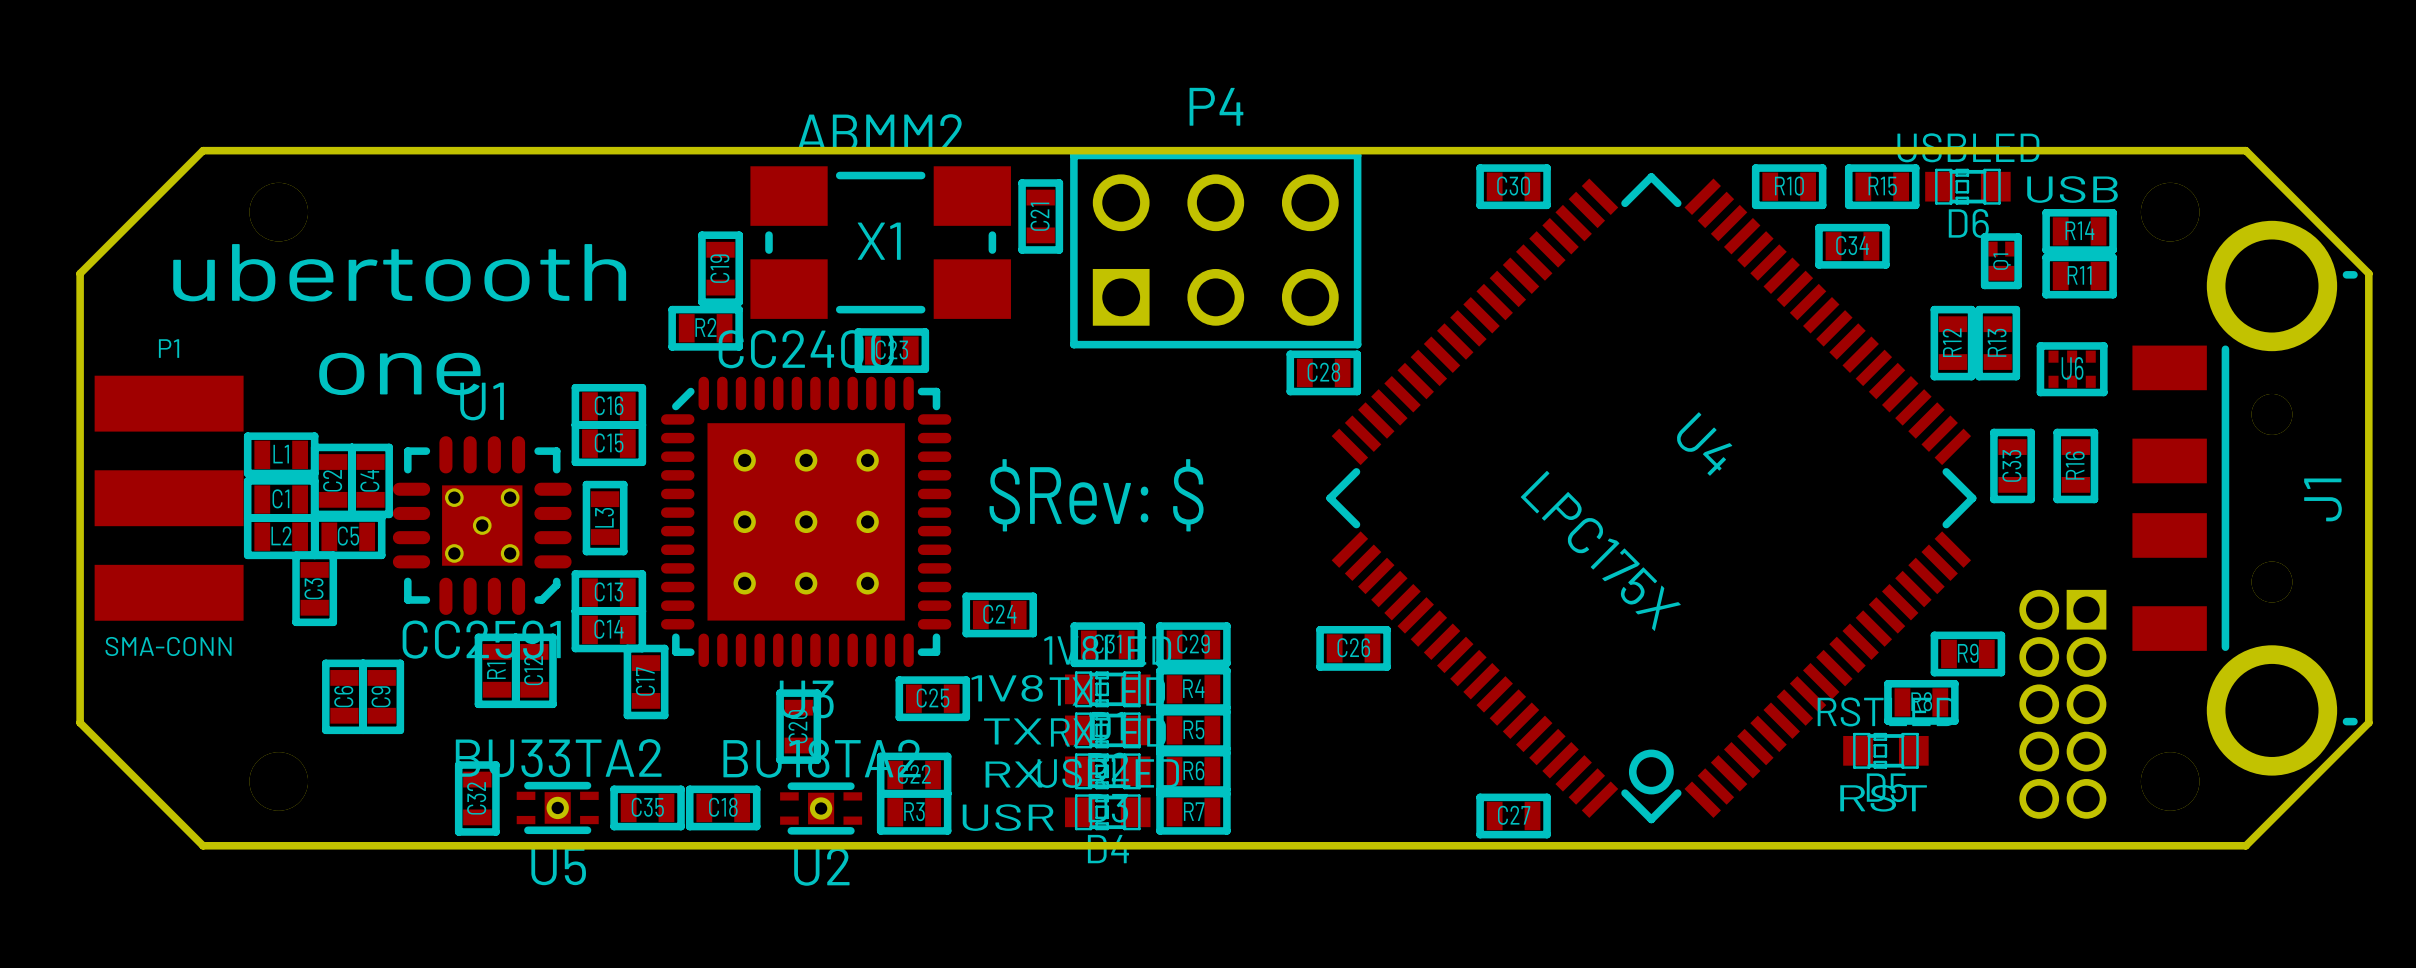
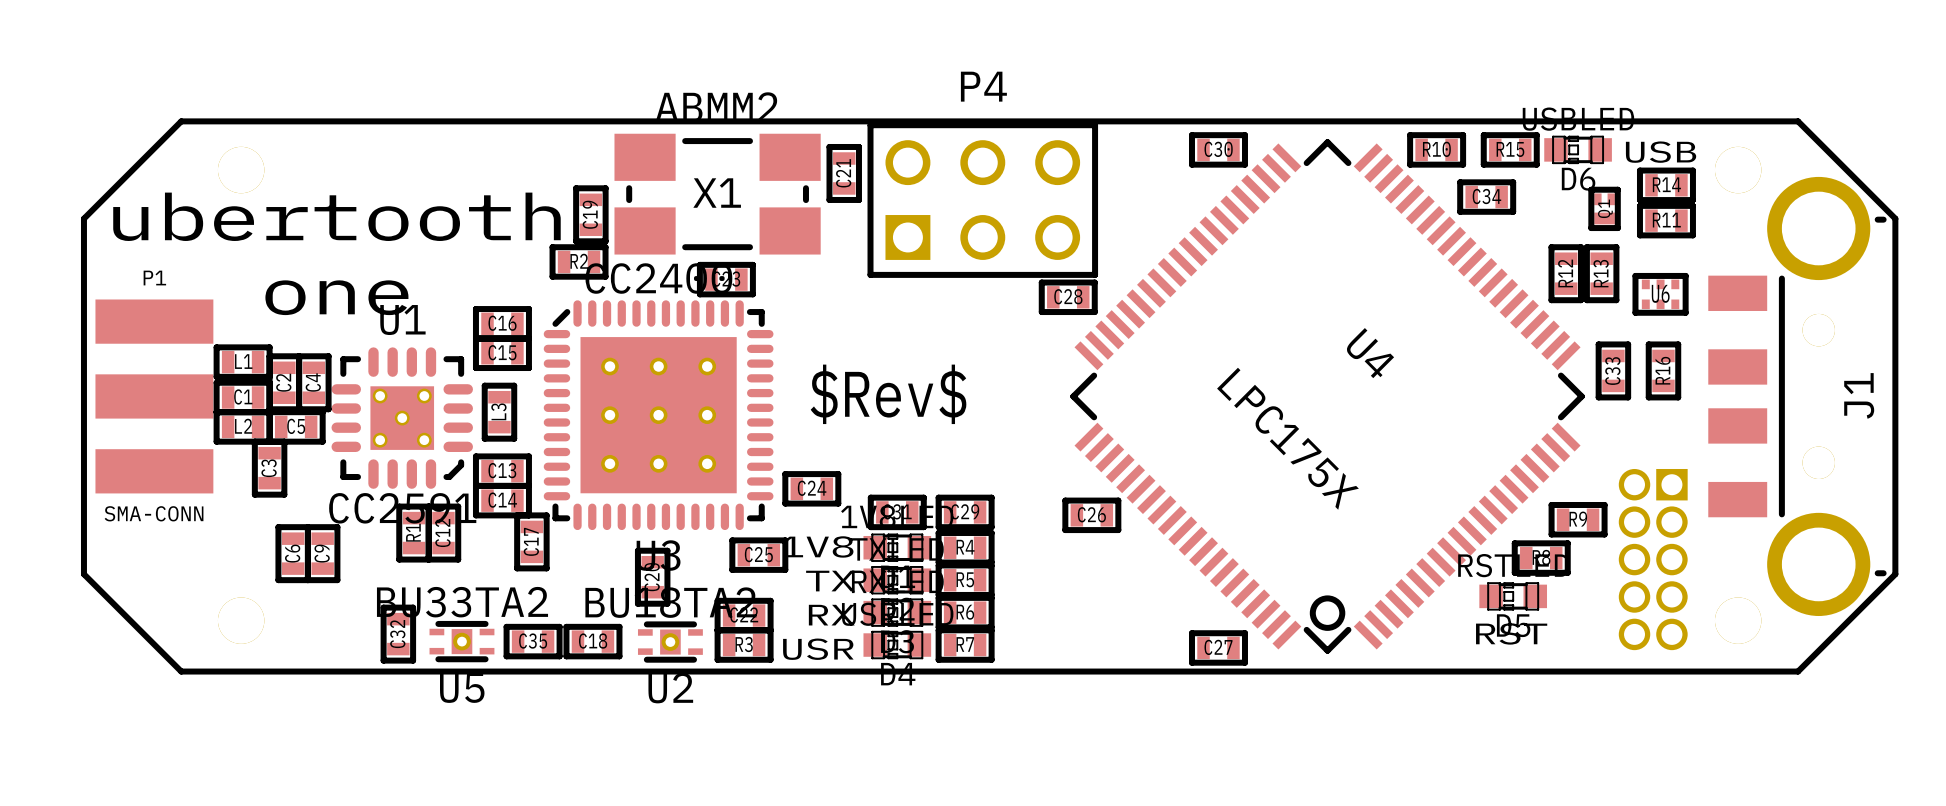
text: $Rev: $ (1096, 495) -> $Rev$ (888, 394)

